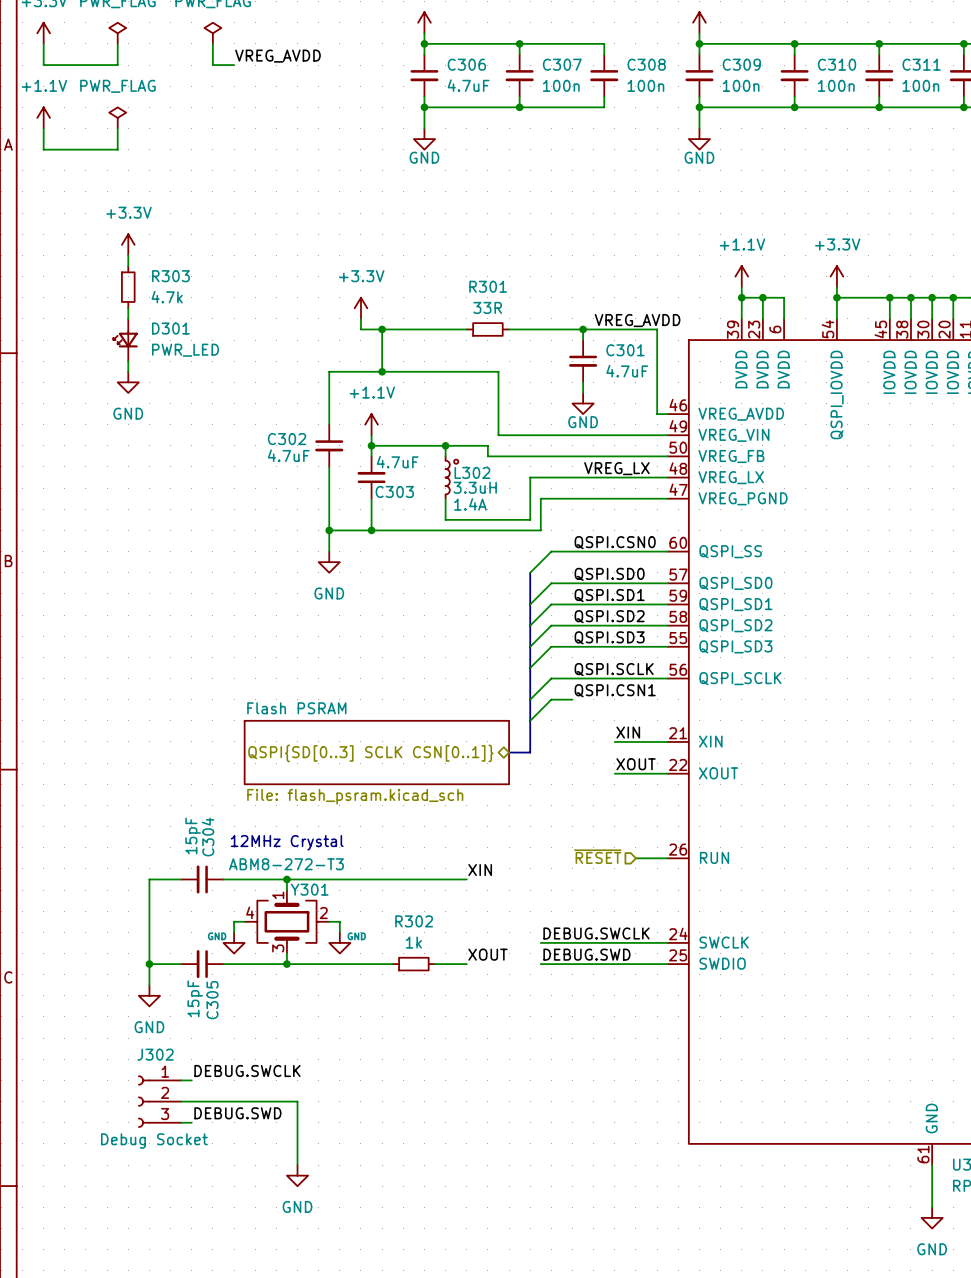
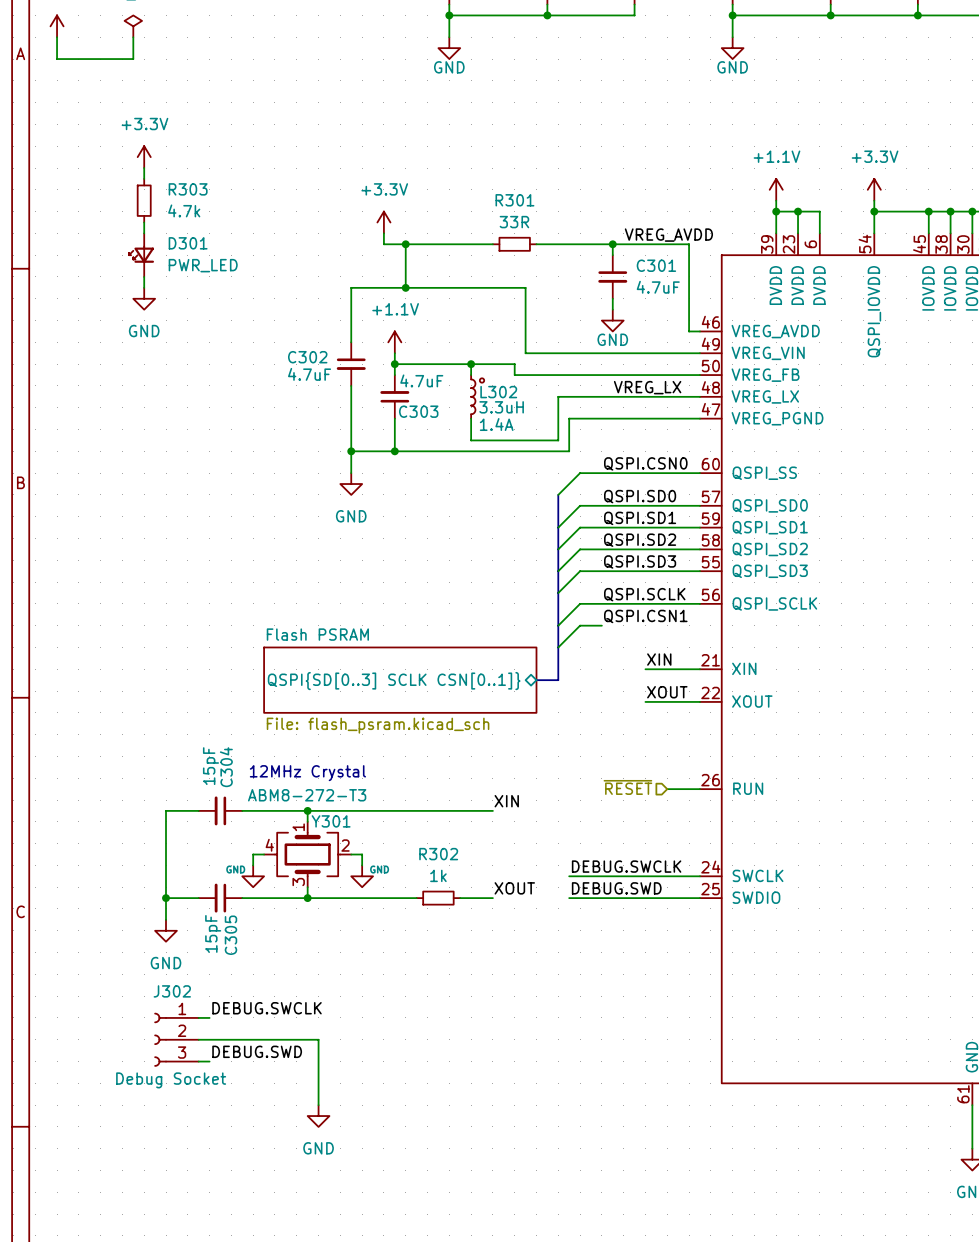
hierarchical label: QSPI{SD[0..3] SCLK CSN[0..1]} (370, 753) -> none
sheet pin: none -> QSPI{SD[0..3] SCLK CSN[0..1]} (394, 681)

